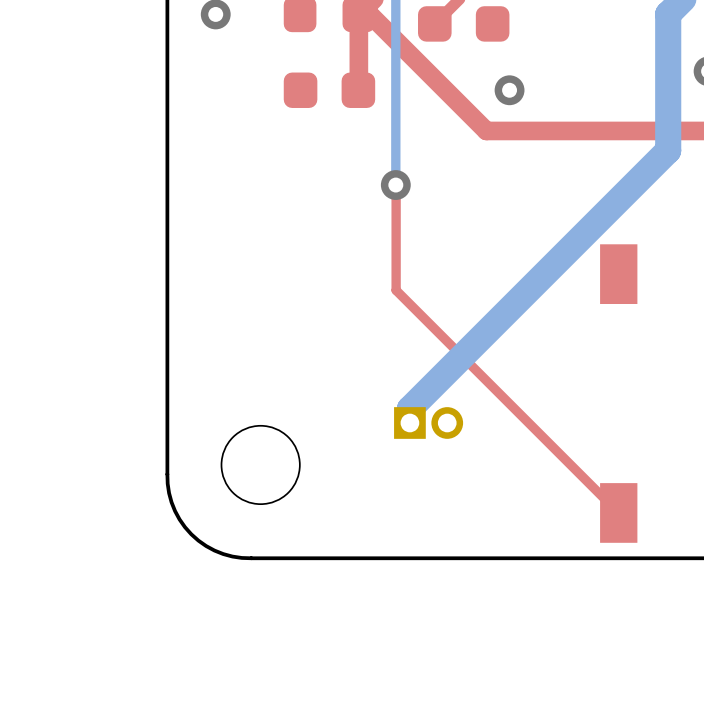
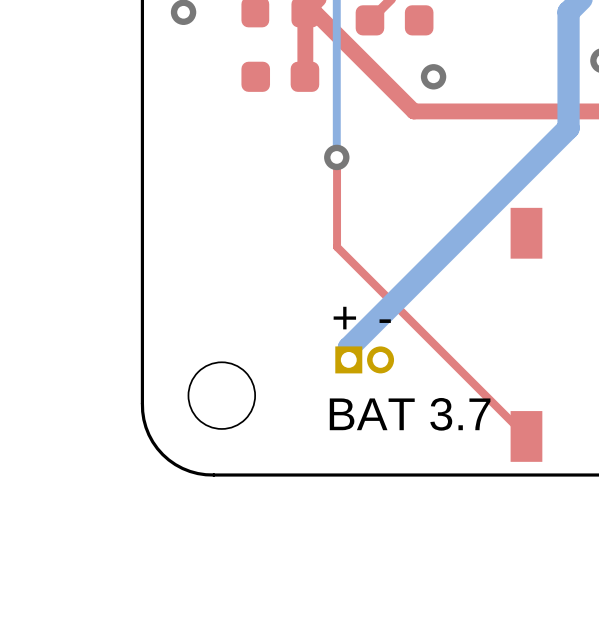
text: none -> + (344, 318)
text: none -> - (385, 321)
text: none -> BAT 3.7 (410, 414)

